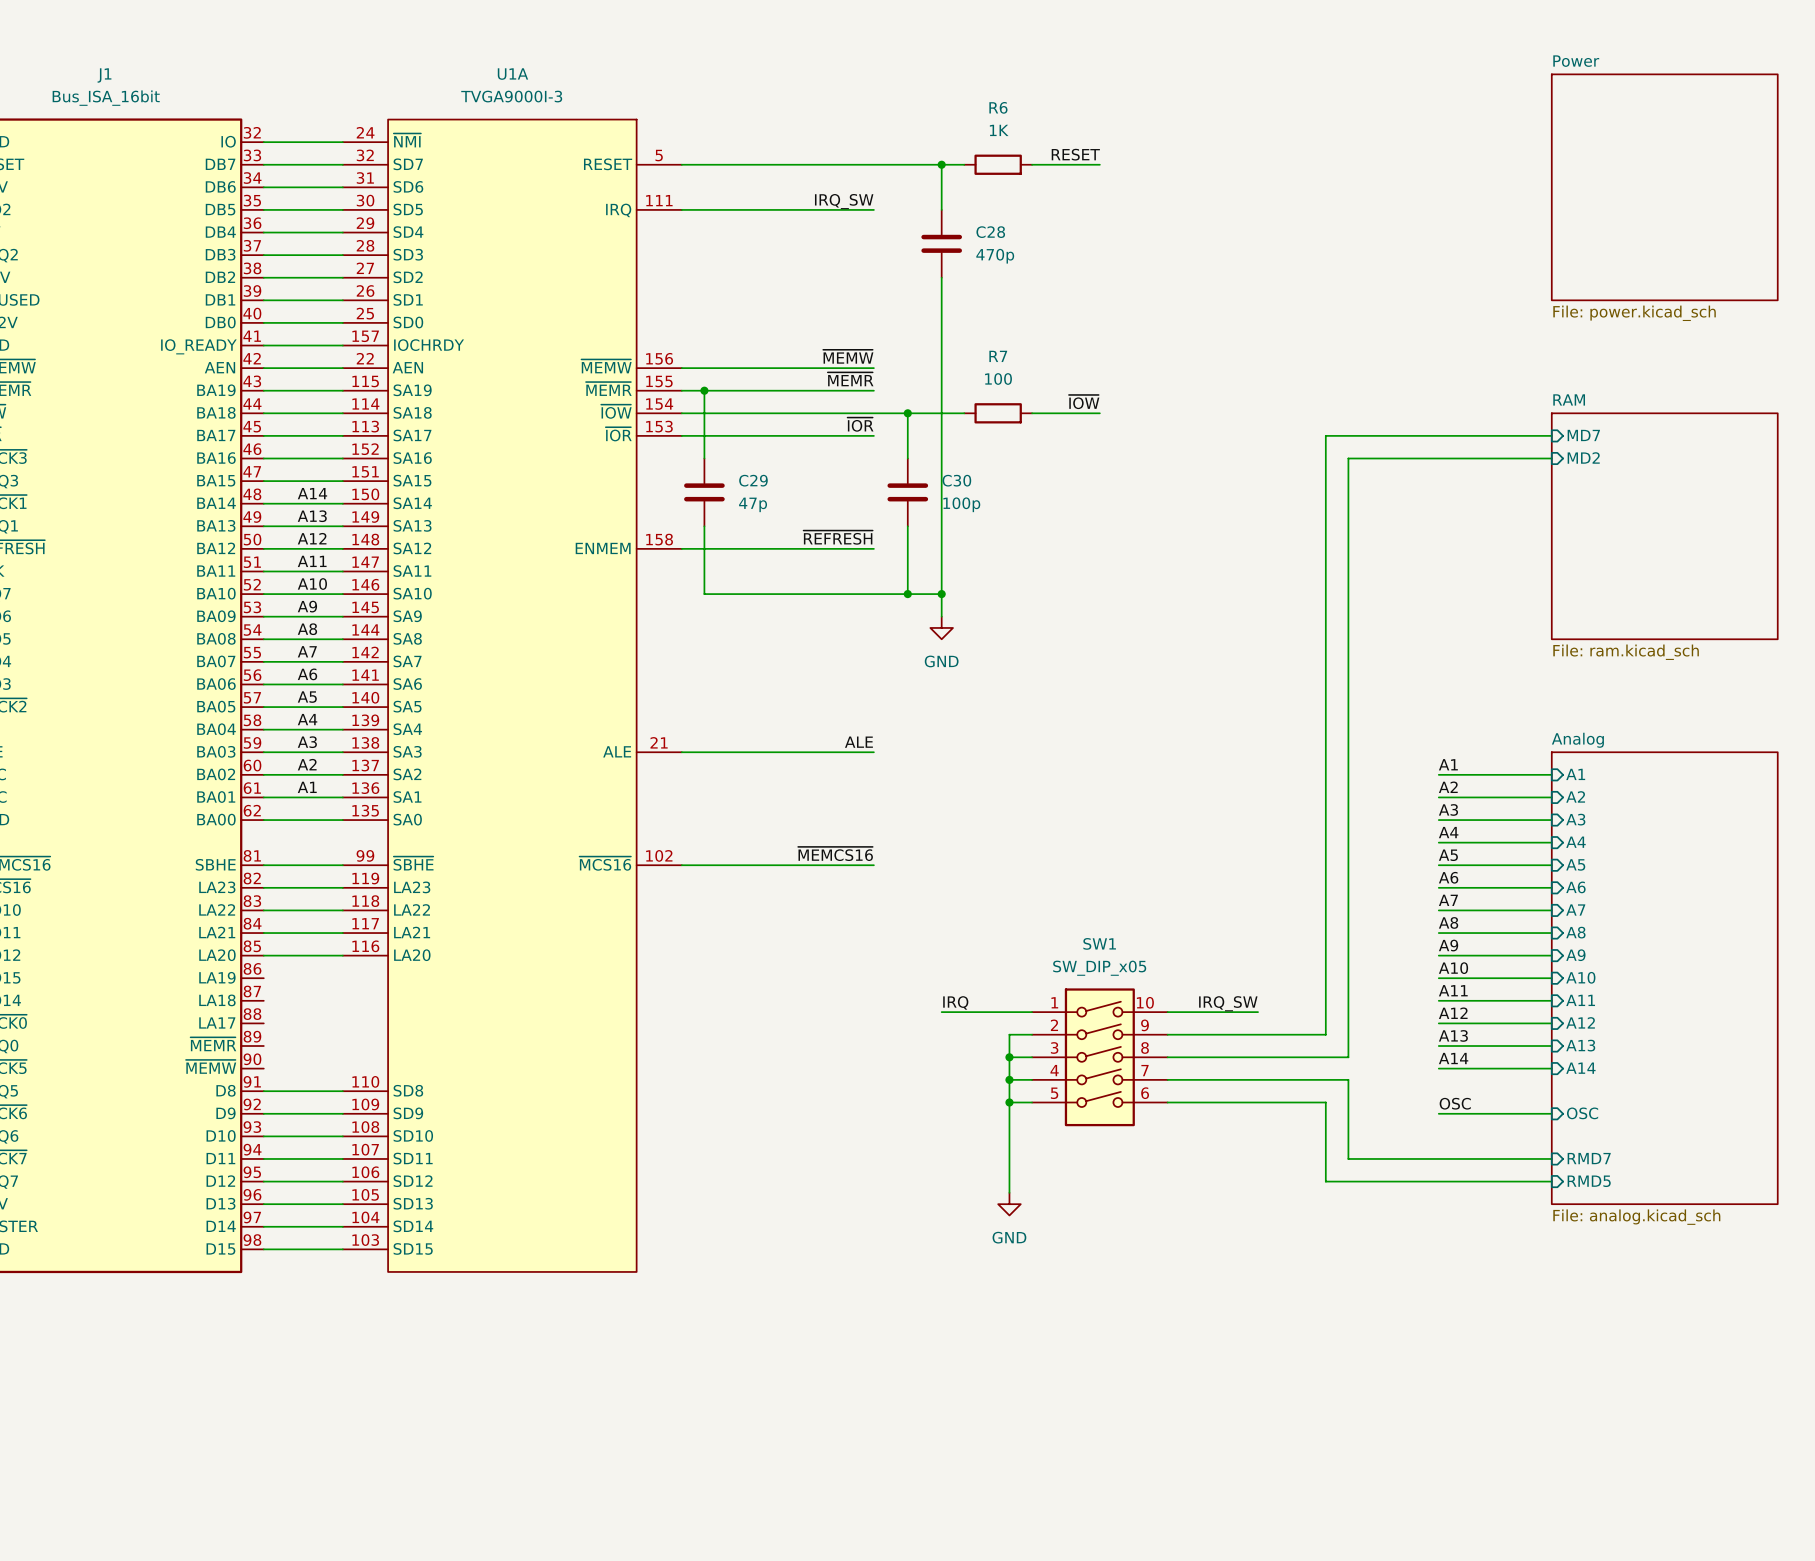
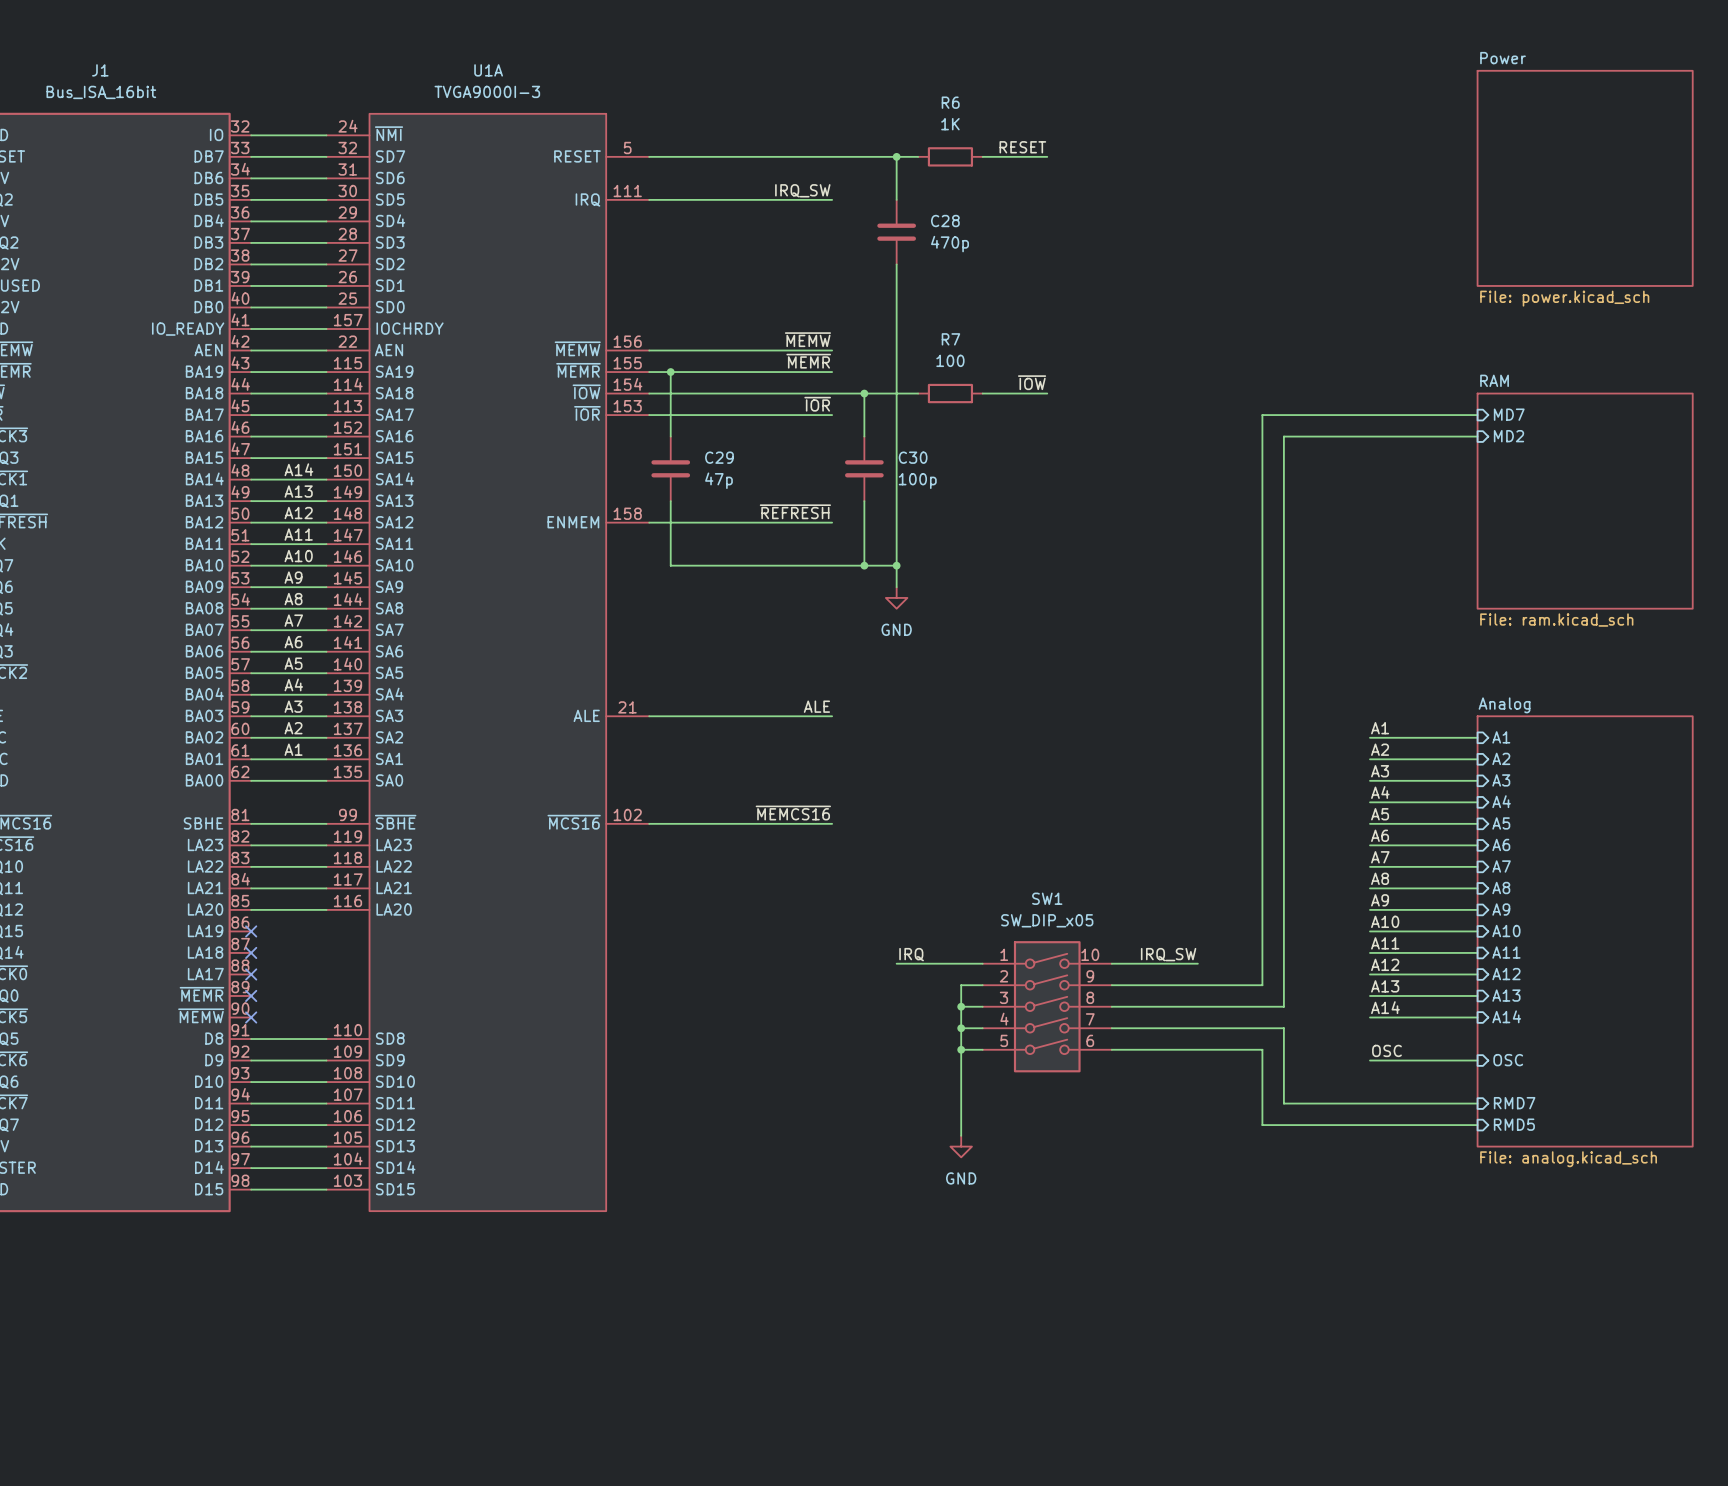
no-connect mark: none -> (251, 931)
no-connect mark: none -> (251, 952)
no-connect mark: none -> (251, 974)
no-connect mark: none -> (251, 995)
no-connect mark: none -> (251, 1017)

